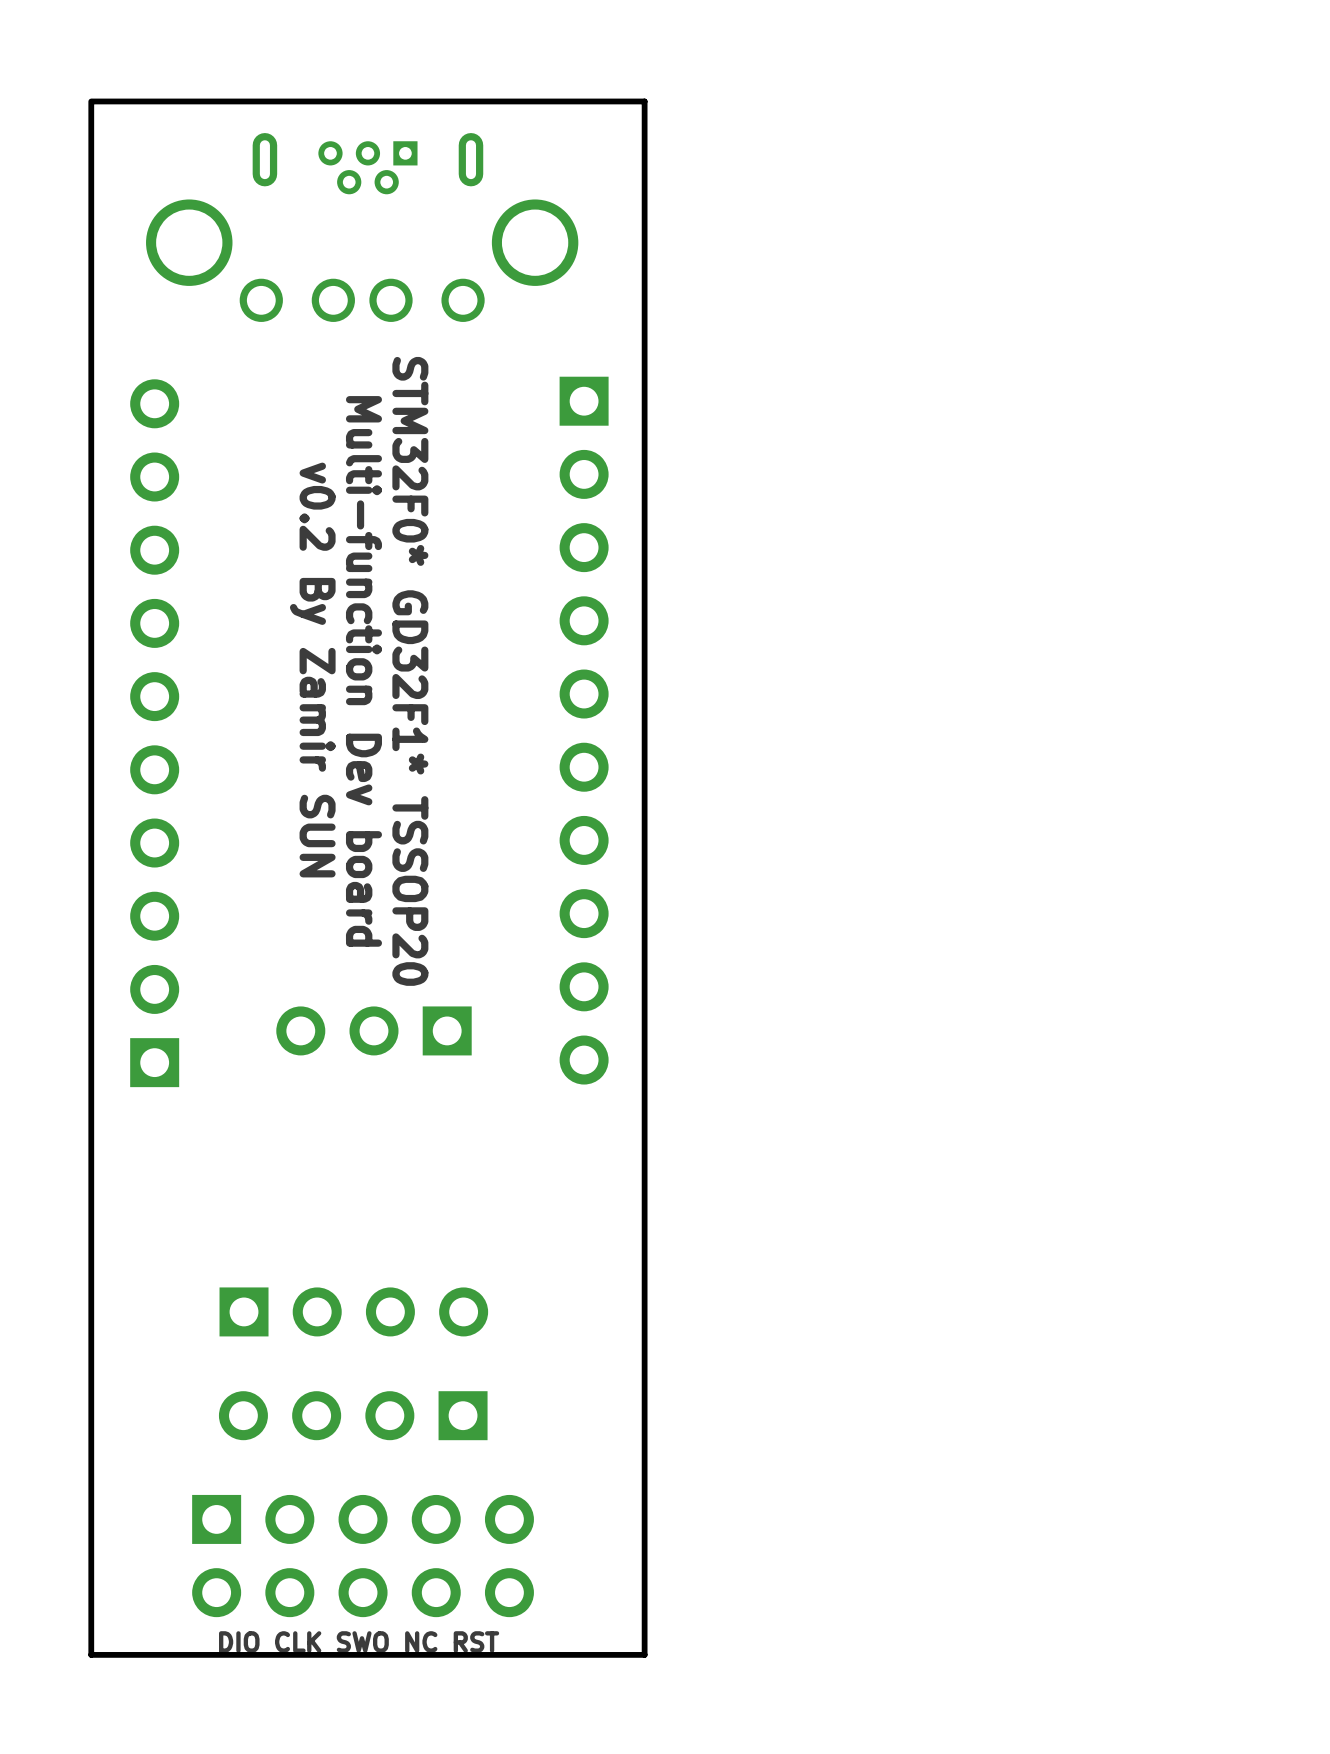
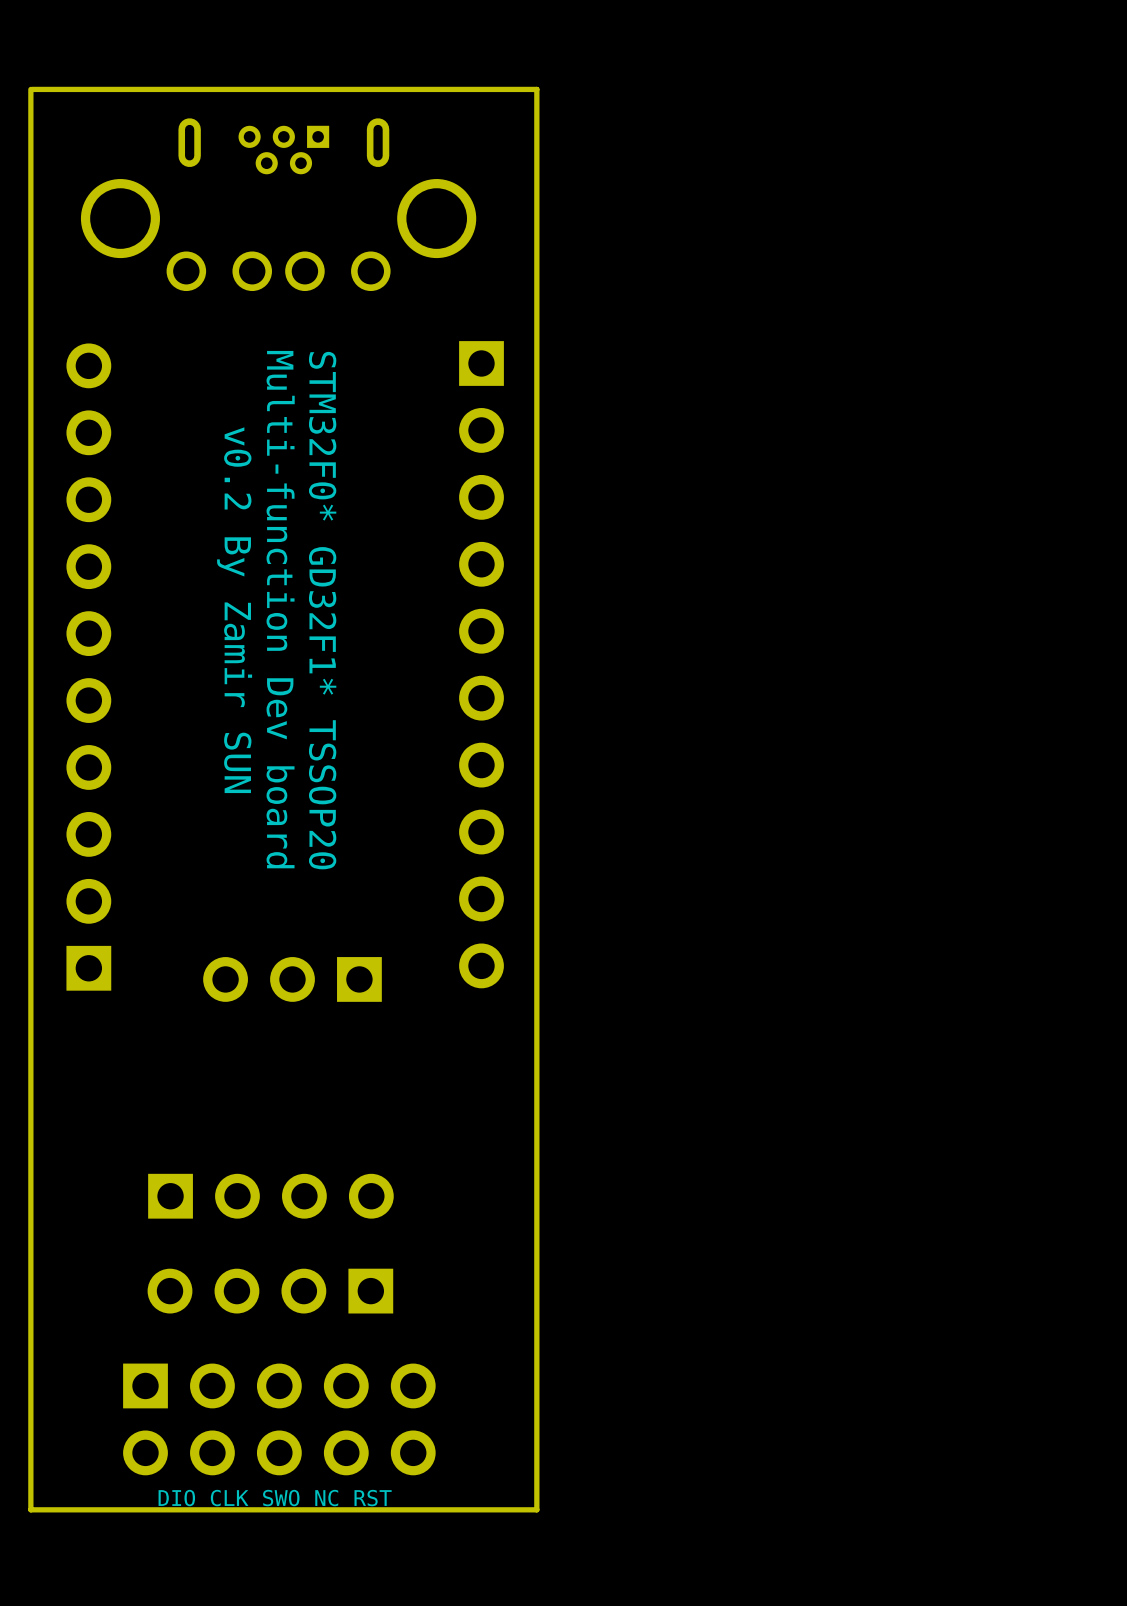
part position: (373, 1030) -> (292, 979)

